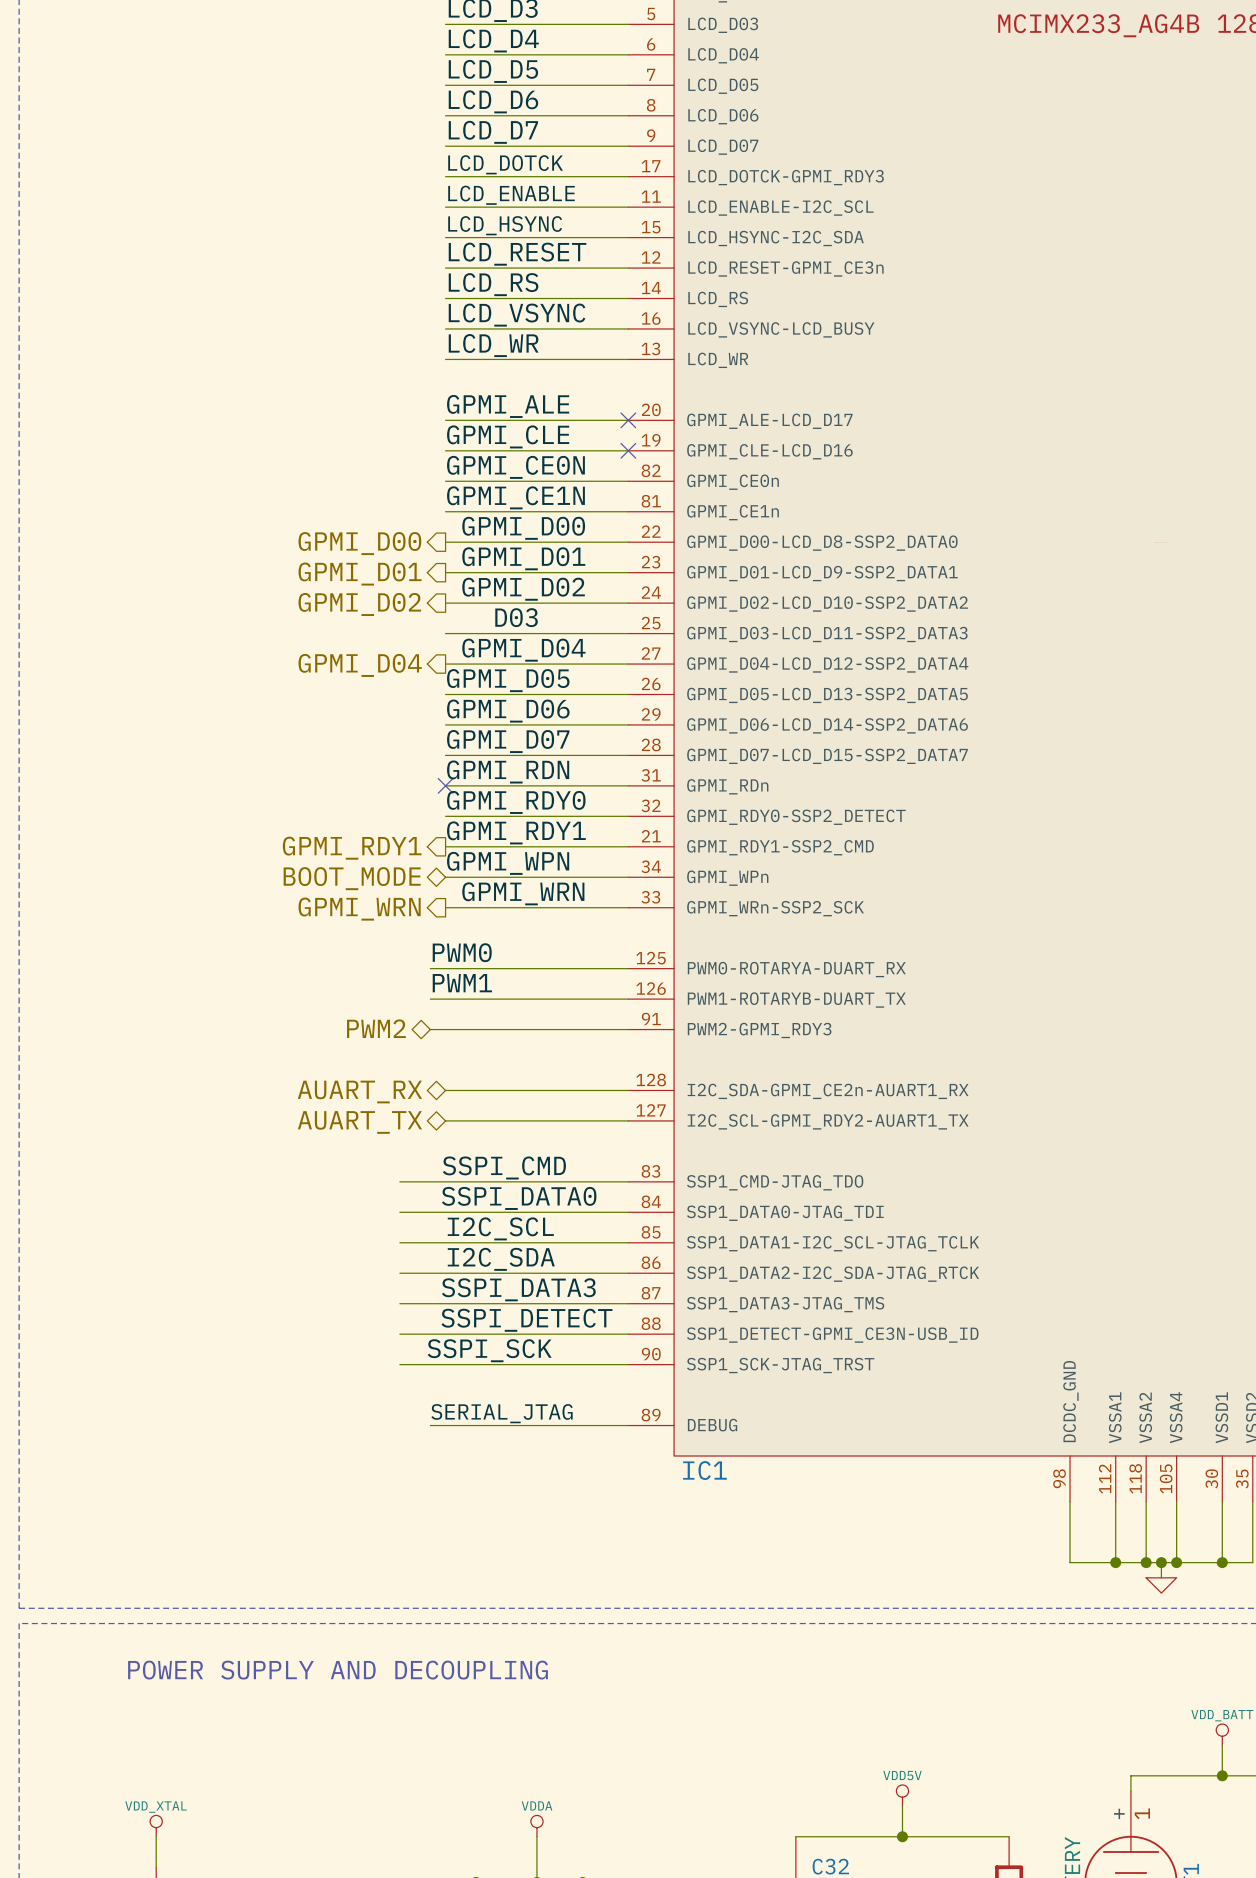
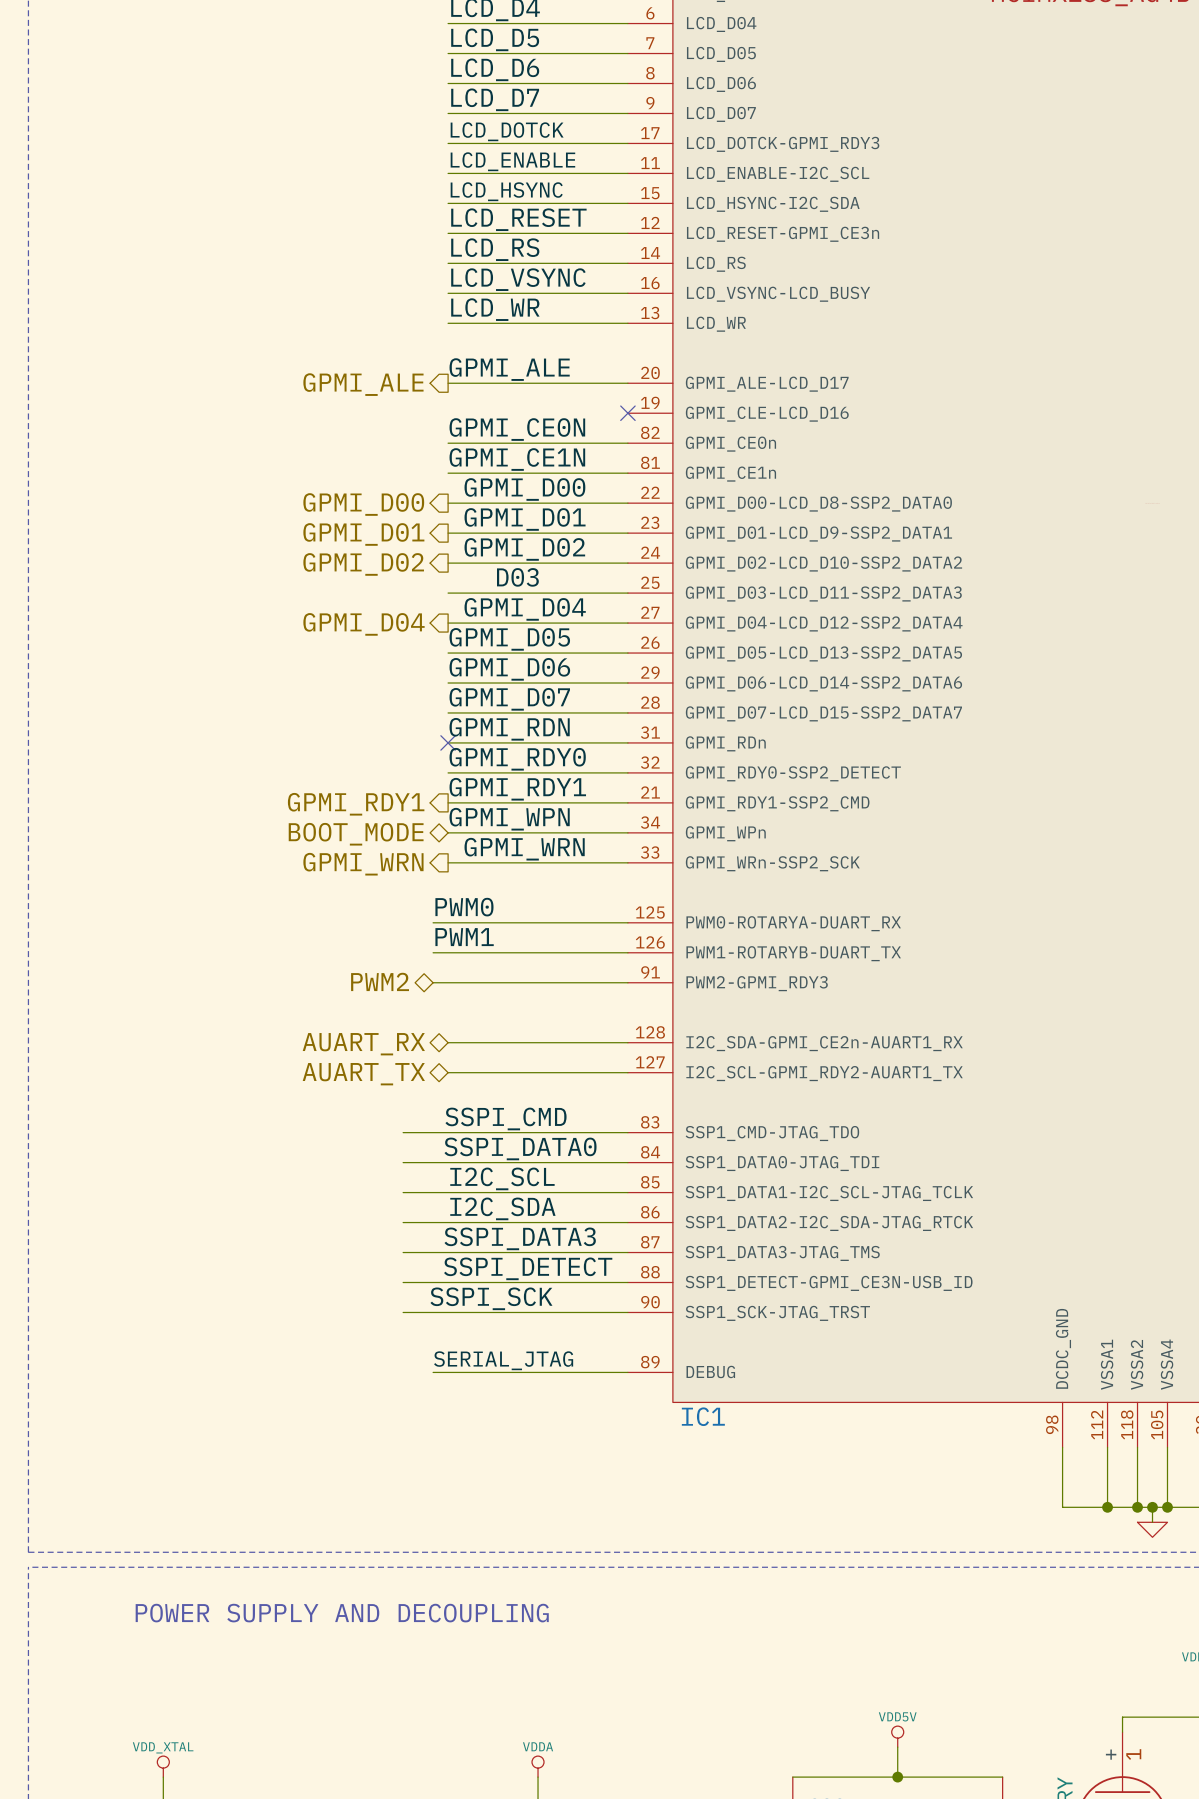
no-connect mark: (628, 420) -> none
hierarchical label: none -> GPMI_ALE (363, 384)
label: GPMI_CLE (508, 436) -> none
wire: (445, 450) (628, 450) -> none

